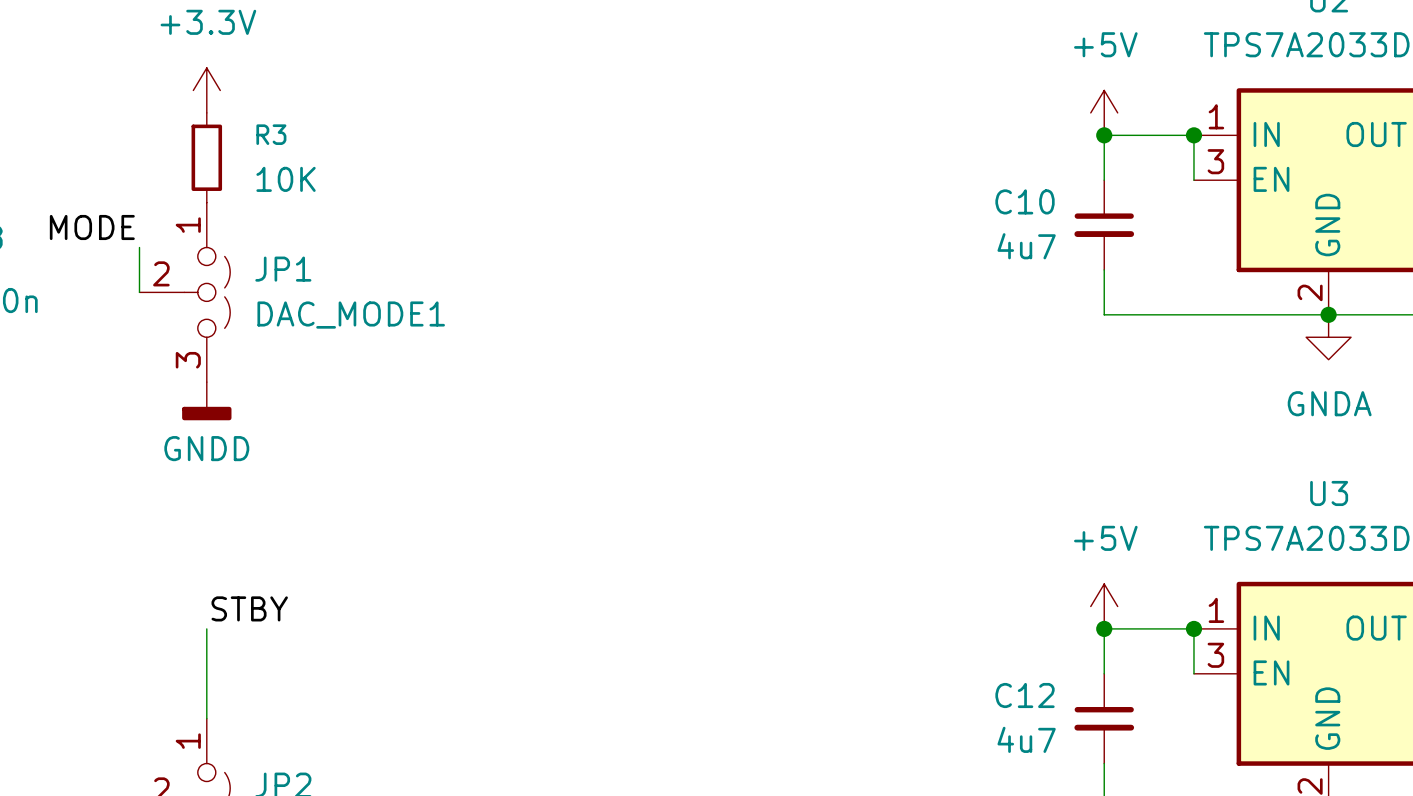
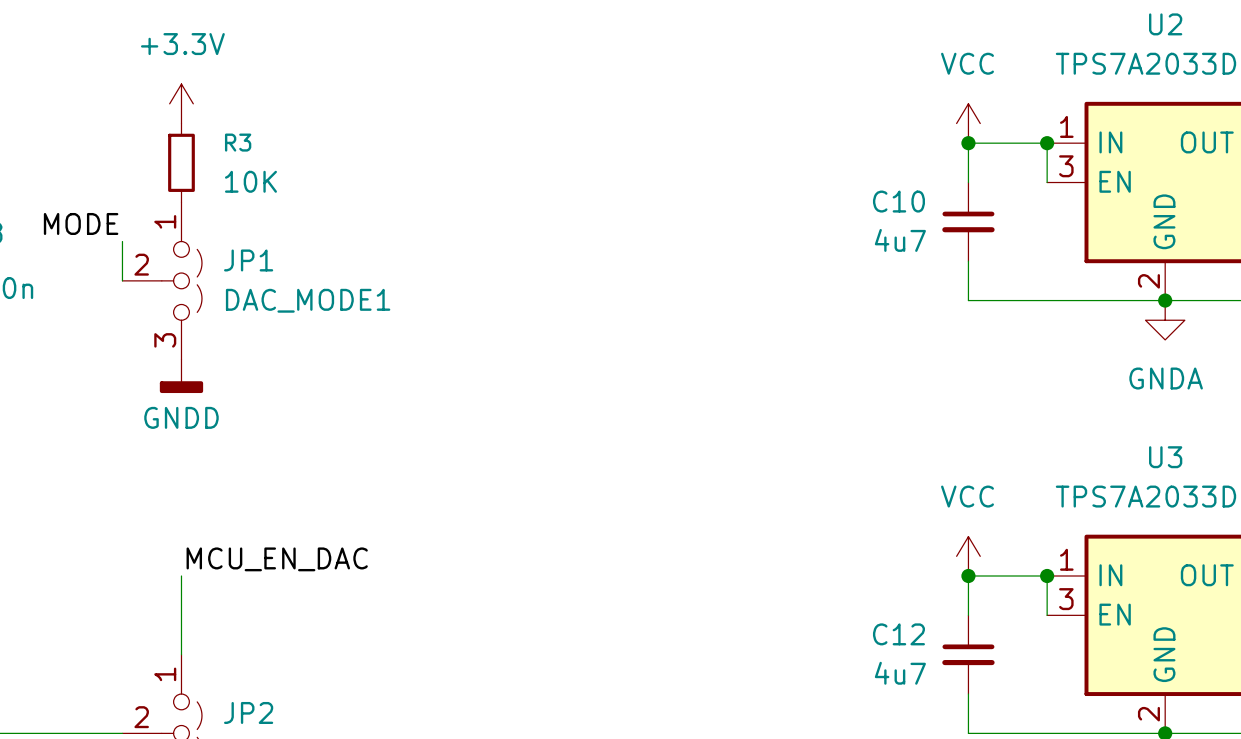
power symbol: +5V (1104, 112) -> VCC (968, 123)
power symbol: +5V (1104, 606) -> VCC (968, 556)
label: STBY (249, 608) -> MCU_EN_DAC (277, 559)

